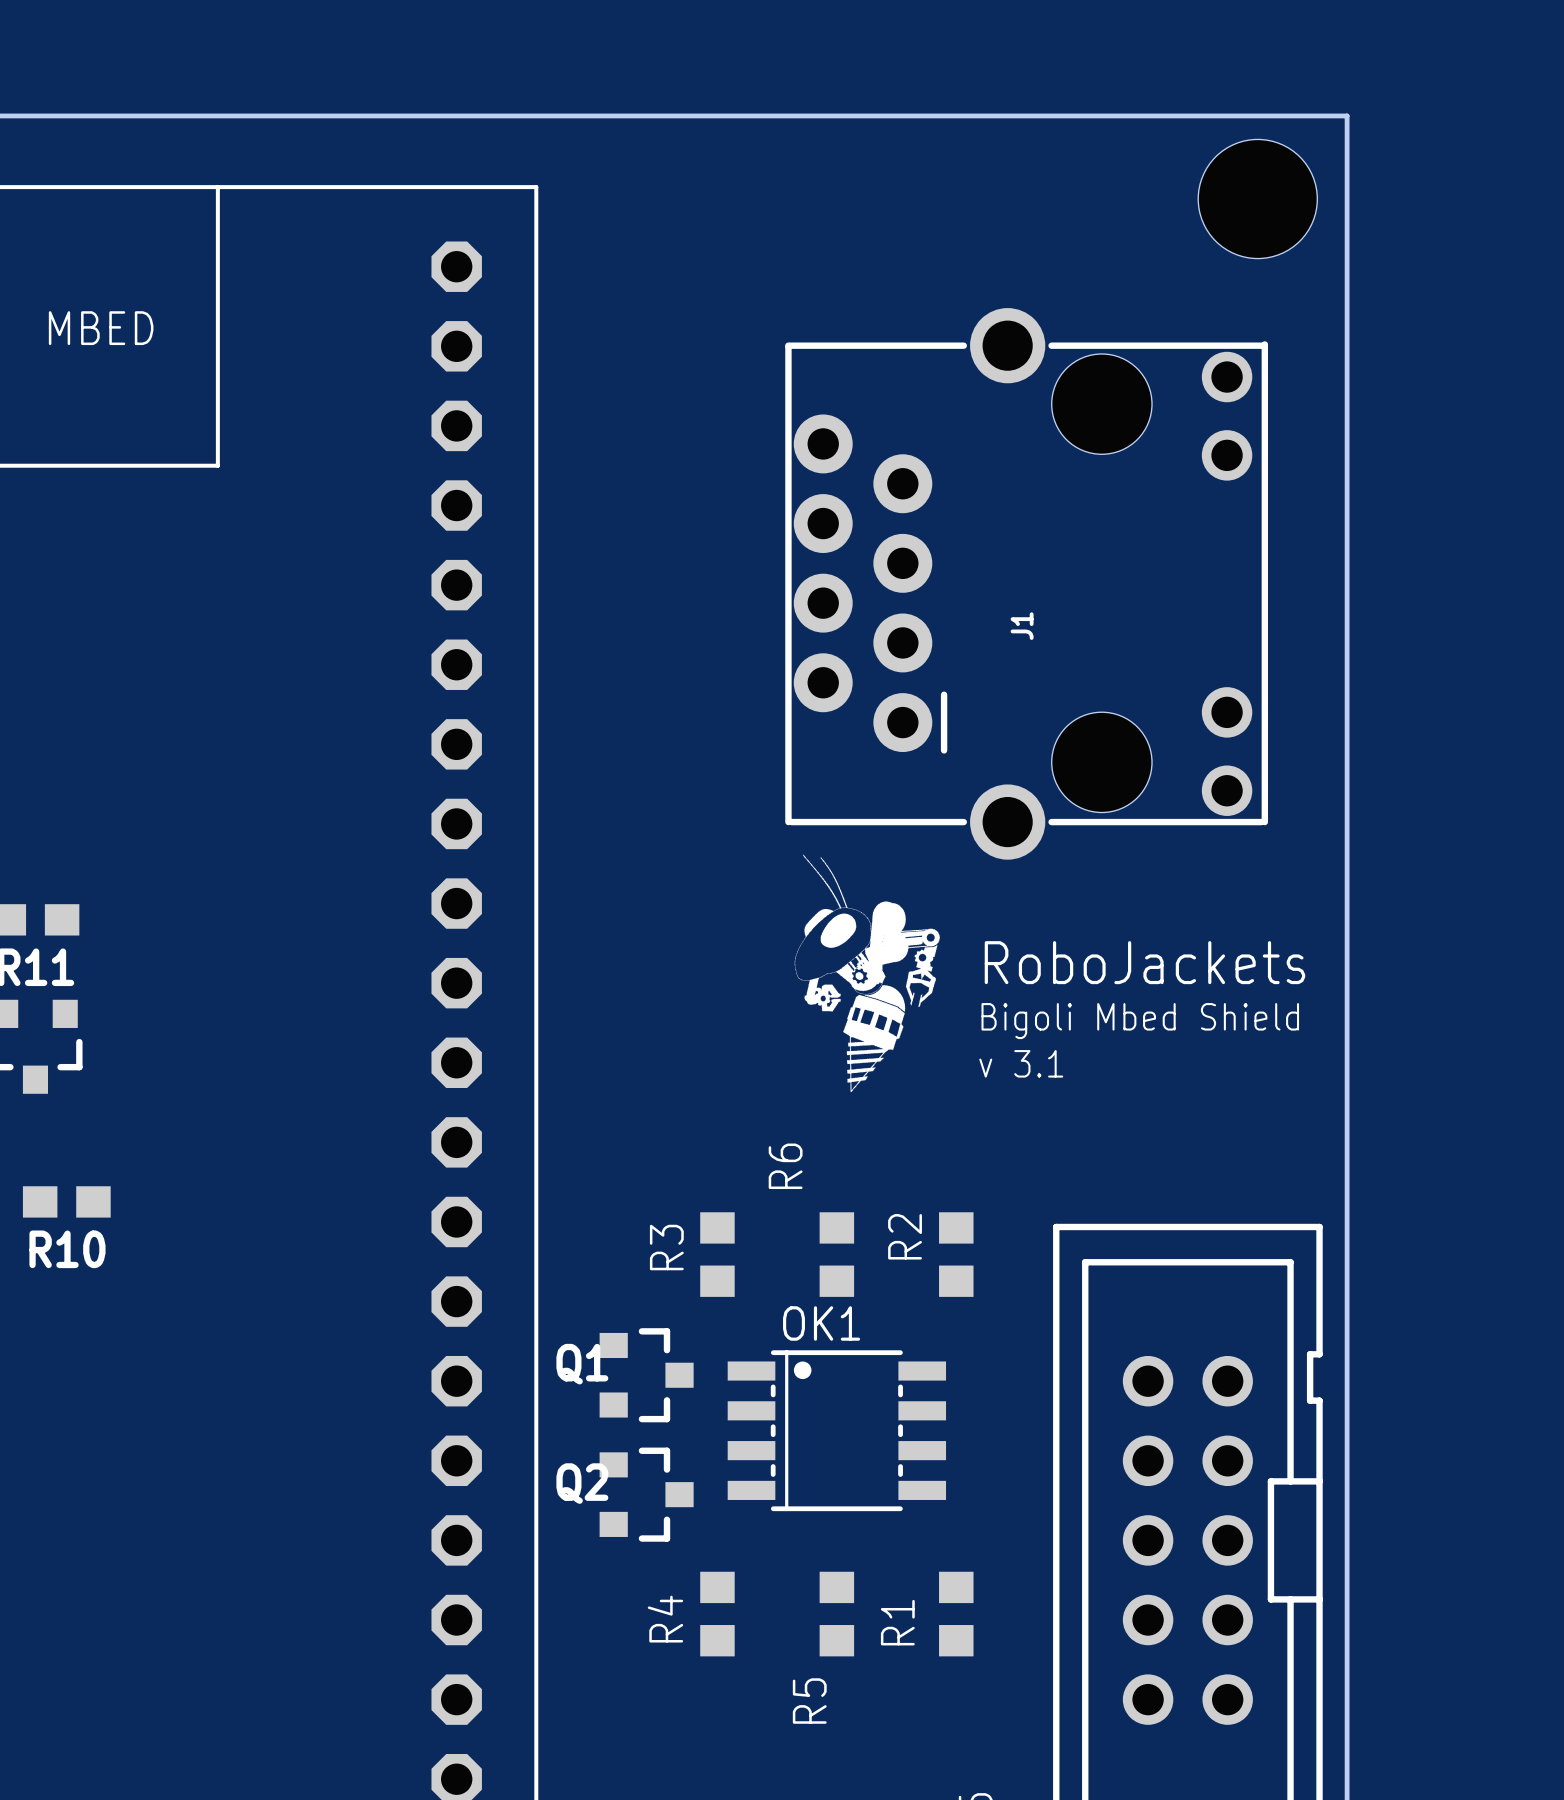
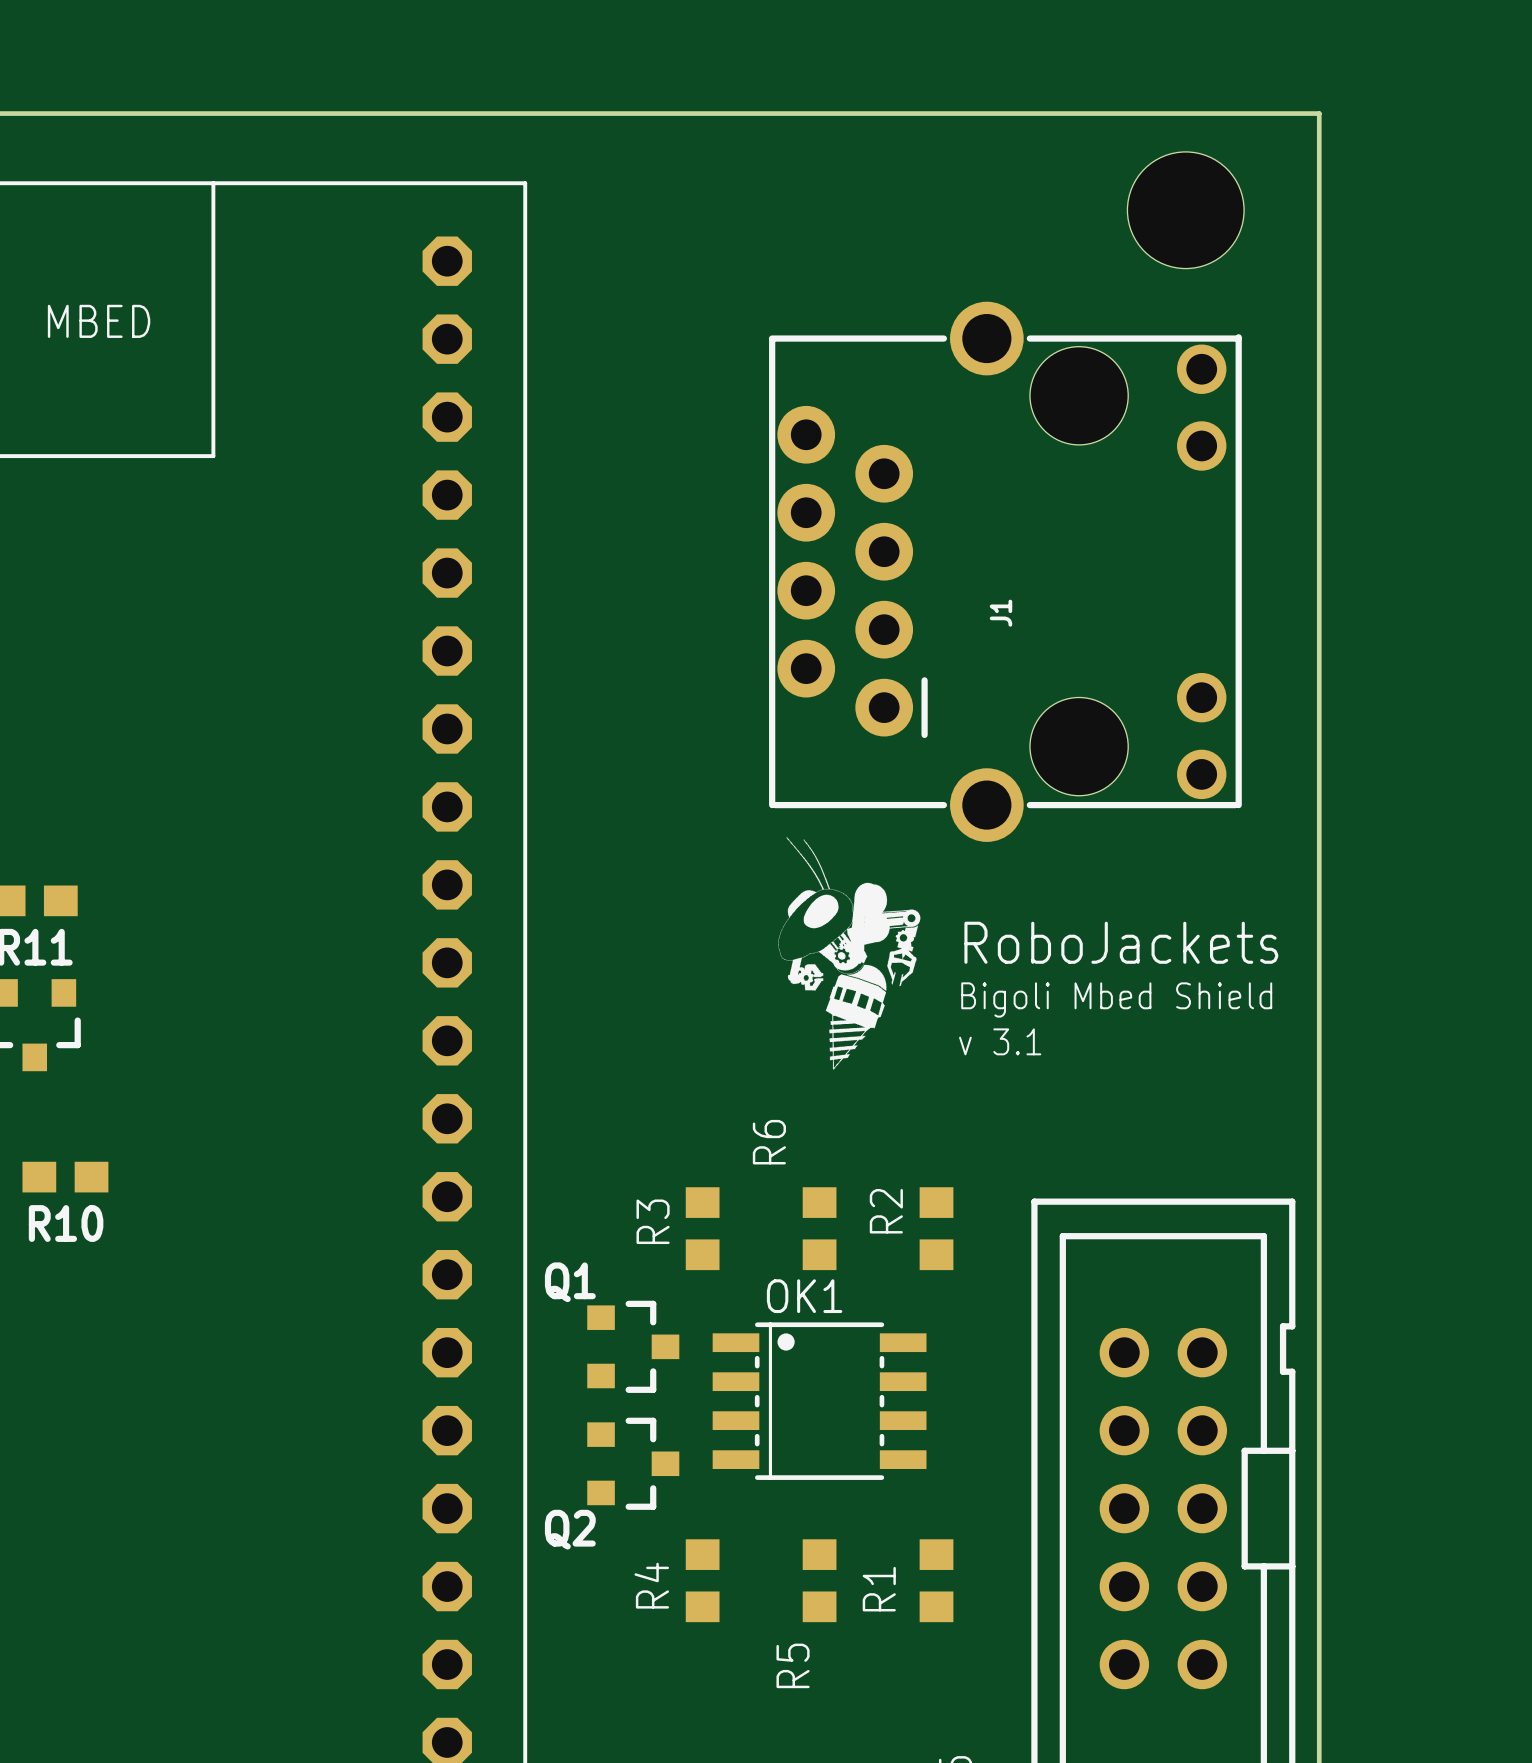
hole position: (1257, 199) -> (1185, 210)
Q1 name position: Q1 (582, 1364) -> Q1 (570, 1282)
Q2 name position: Q2 (582, 1483) -> Q2 (570, 1529)

